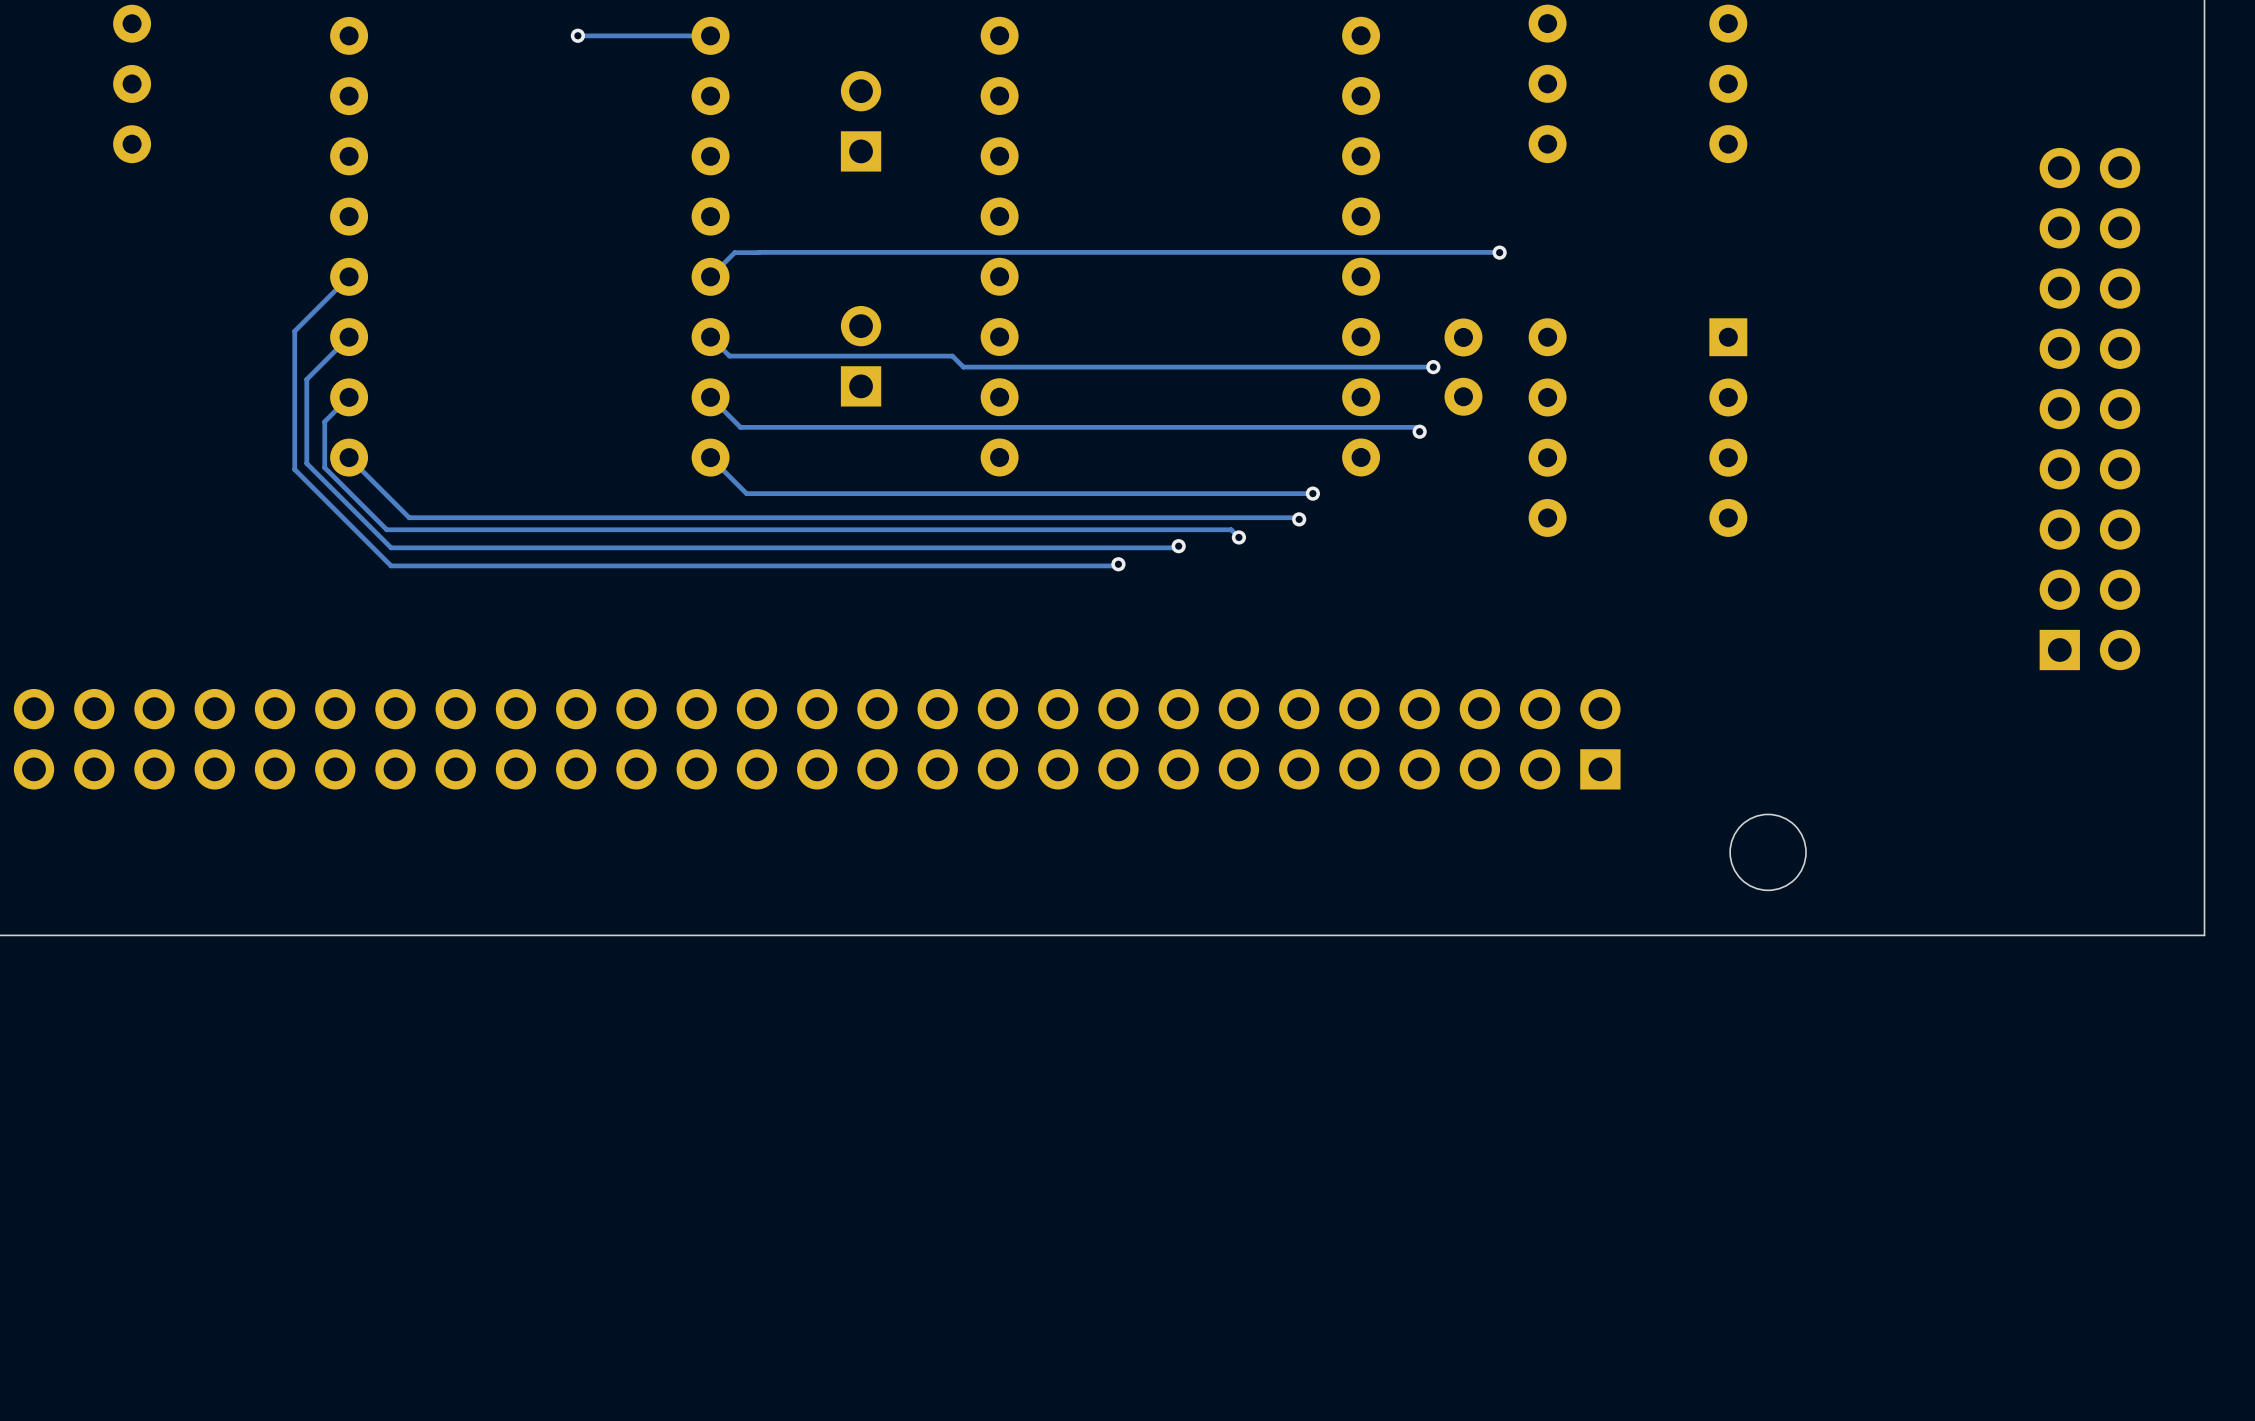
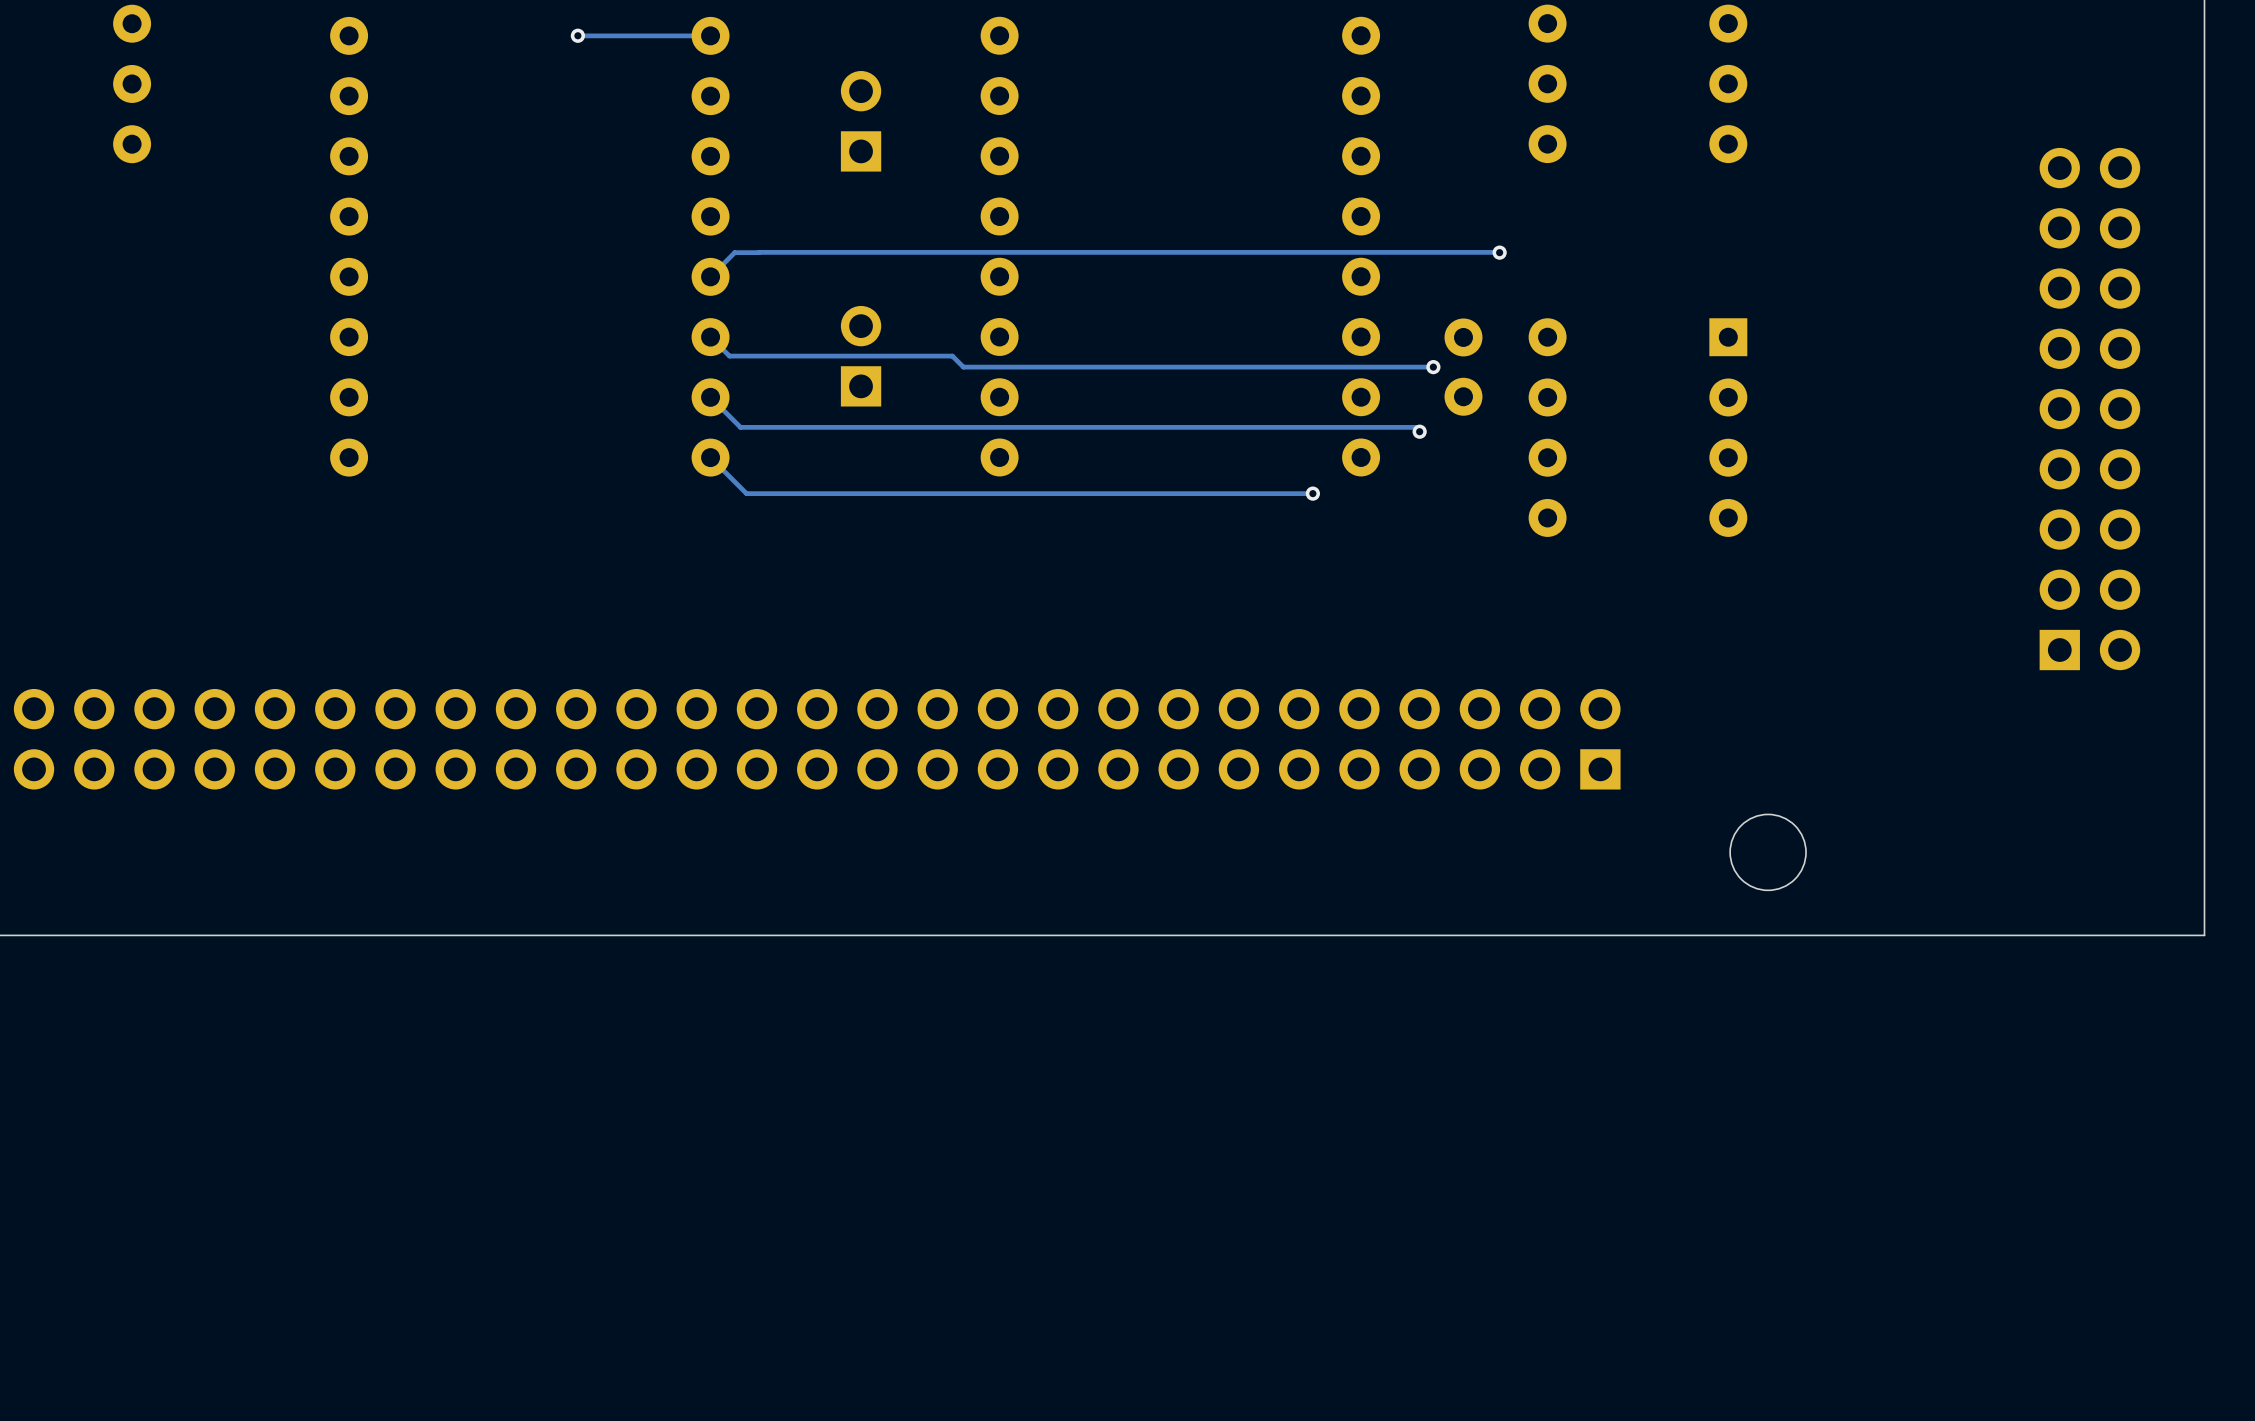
track: (349, 276) (294, 331) (294, 469) (391, 565) (1116, 565) (1118, 564) -> none
track: (349, 337) (306, 379) (306, 463) (391, 547) (1177, 547) (1178, 546) -> none
track: (349, 397) (324, 421) (324, 467) (386, 529) (1231, 529) (1238, 537) -> none
track: (349, 457) (409, 517) (1297, 517) (1299, 519) -> none
via: (1299, 519) -> none
via: (1238, 537) -> none
via: (1178, 546) -> none
via: (1118, 564) -> none

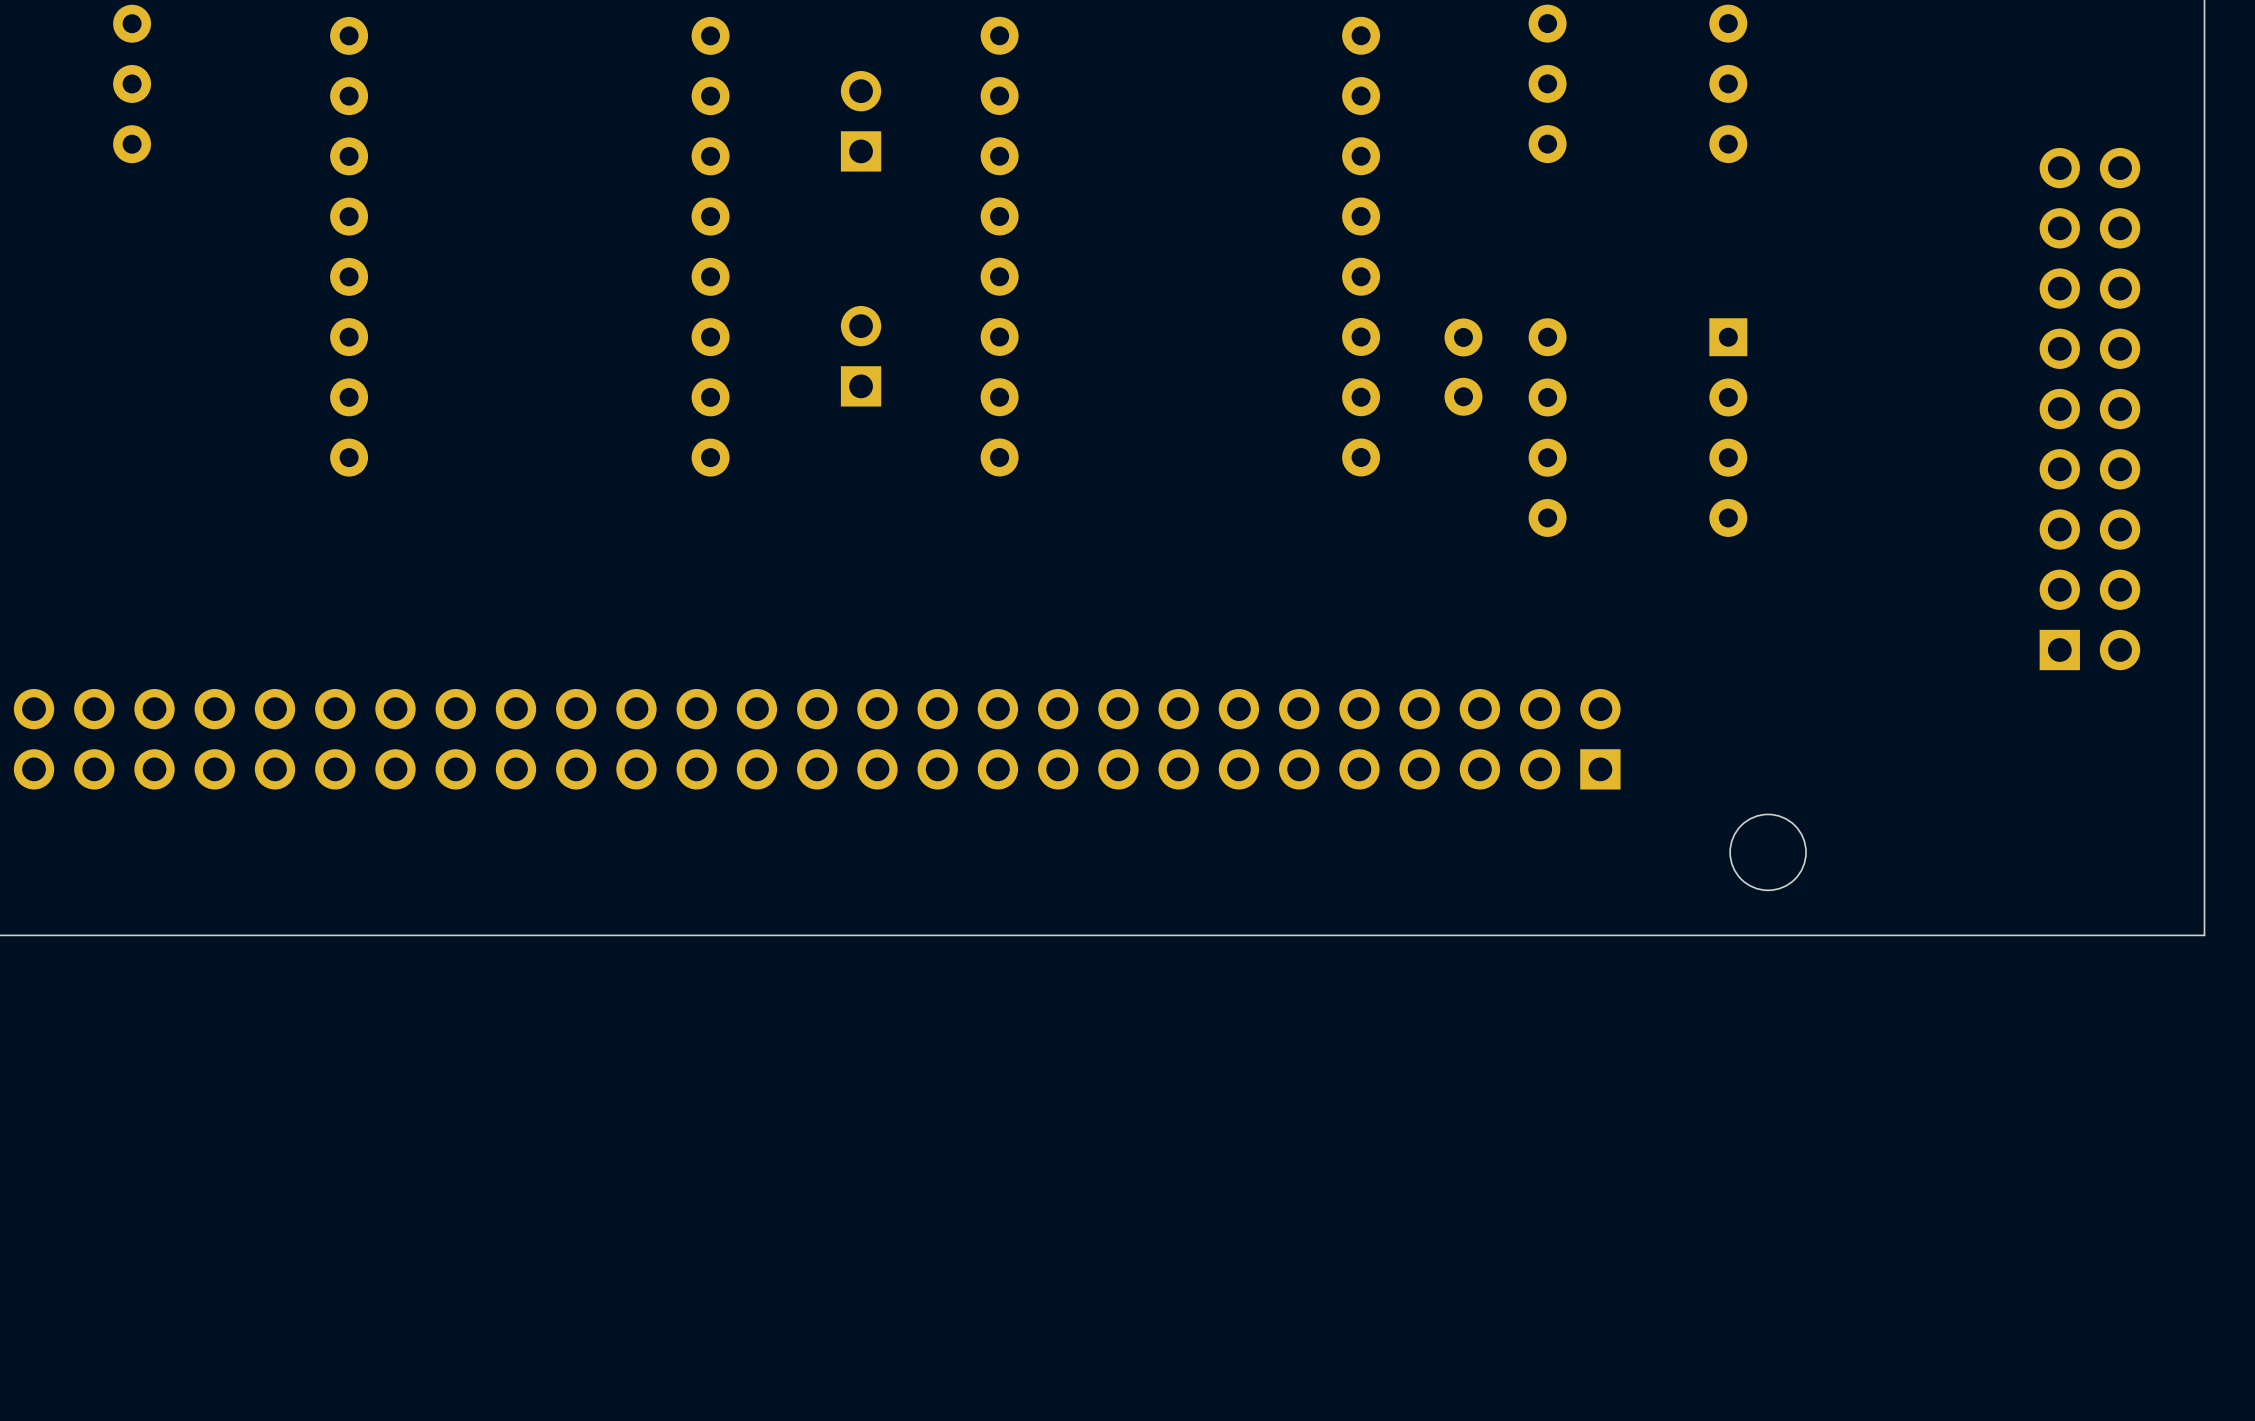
track: (710, 29) (710, 35) (578, 35) -> none
via: (577, 35) -> none
track: (758, 252) (734, 252) (710, 276) -> none
track: (1499, 252) (758, 252) -> none
via: (1499, 252) -> none
track: (710, 337) (729, 356) (952, 356) (963, 367) (1433, 367) -> none
via: (1433, 367) -> none
track: (710, 397) (740, 427) (1415, 427) (1419, 431) -> none
via: (1419, 431) -> none
track: (710, 457) (746, 493) (1312, 493) -> none
via: (1312, 493) -> none

